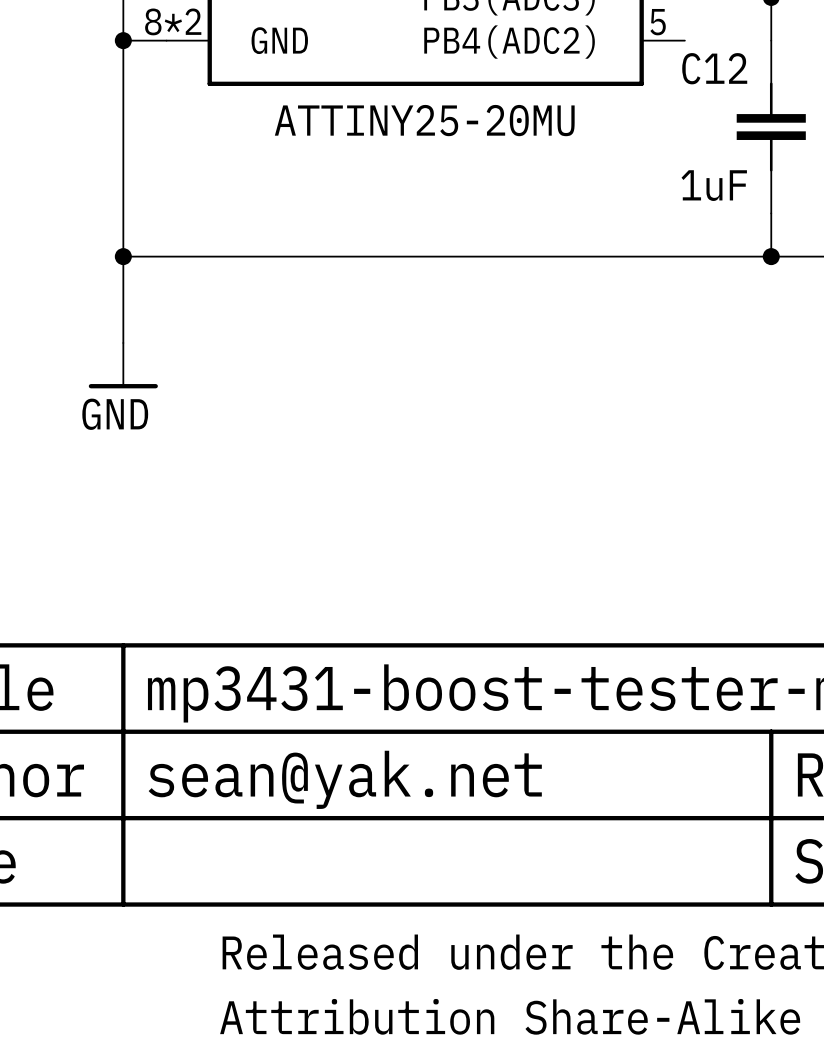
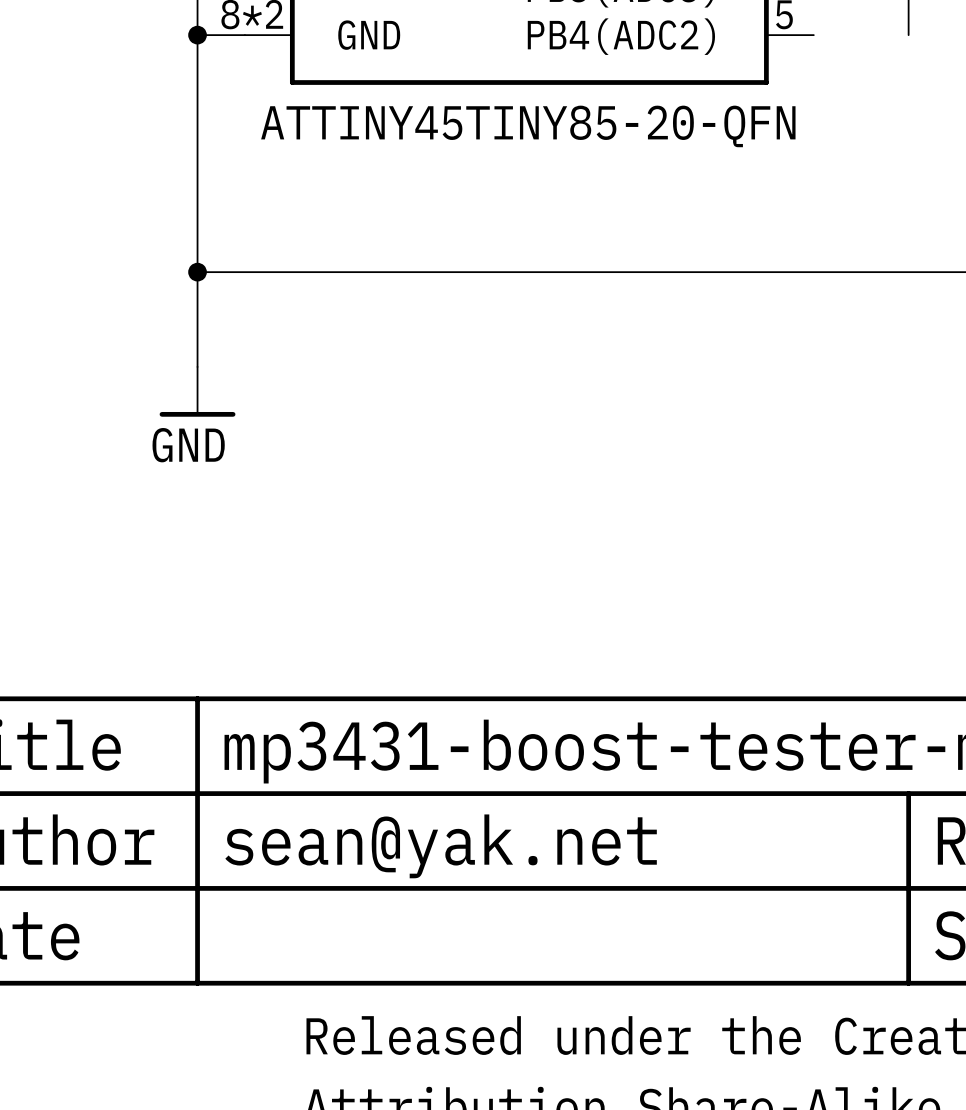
part value: ATTINY25-20MU (424, 120) -> ATTINY45TINY85-20-QFN (528, 126)
C12: 1uF (771, 127) -> none
wire: (771, 213) (771, 256) -> none
junction: (771, 256) -> none

